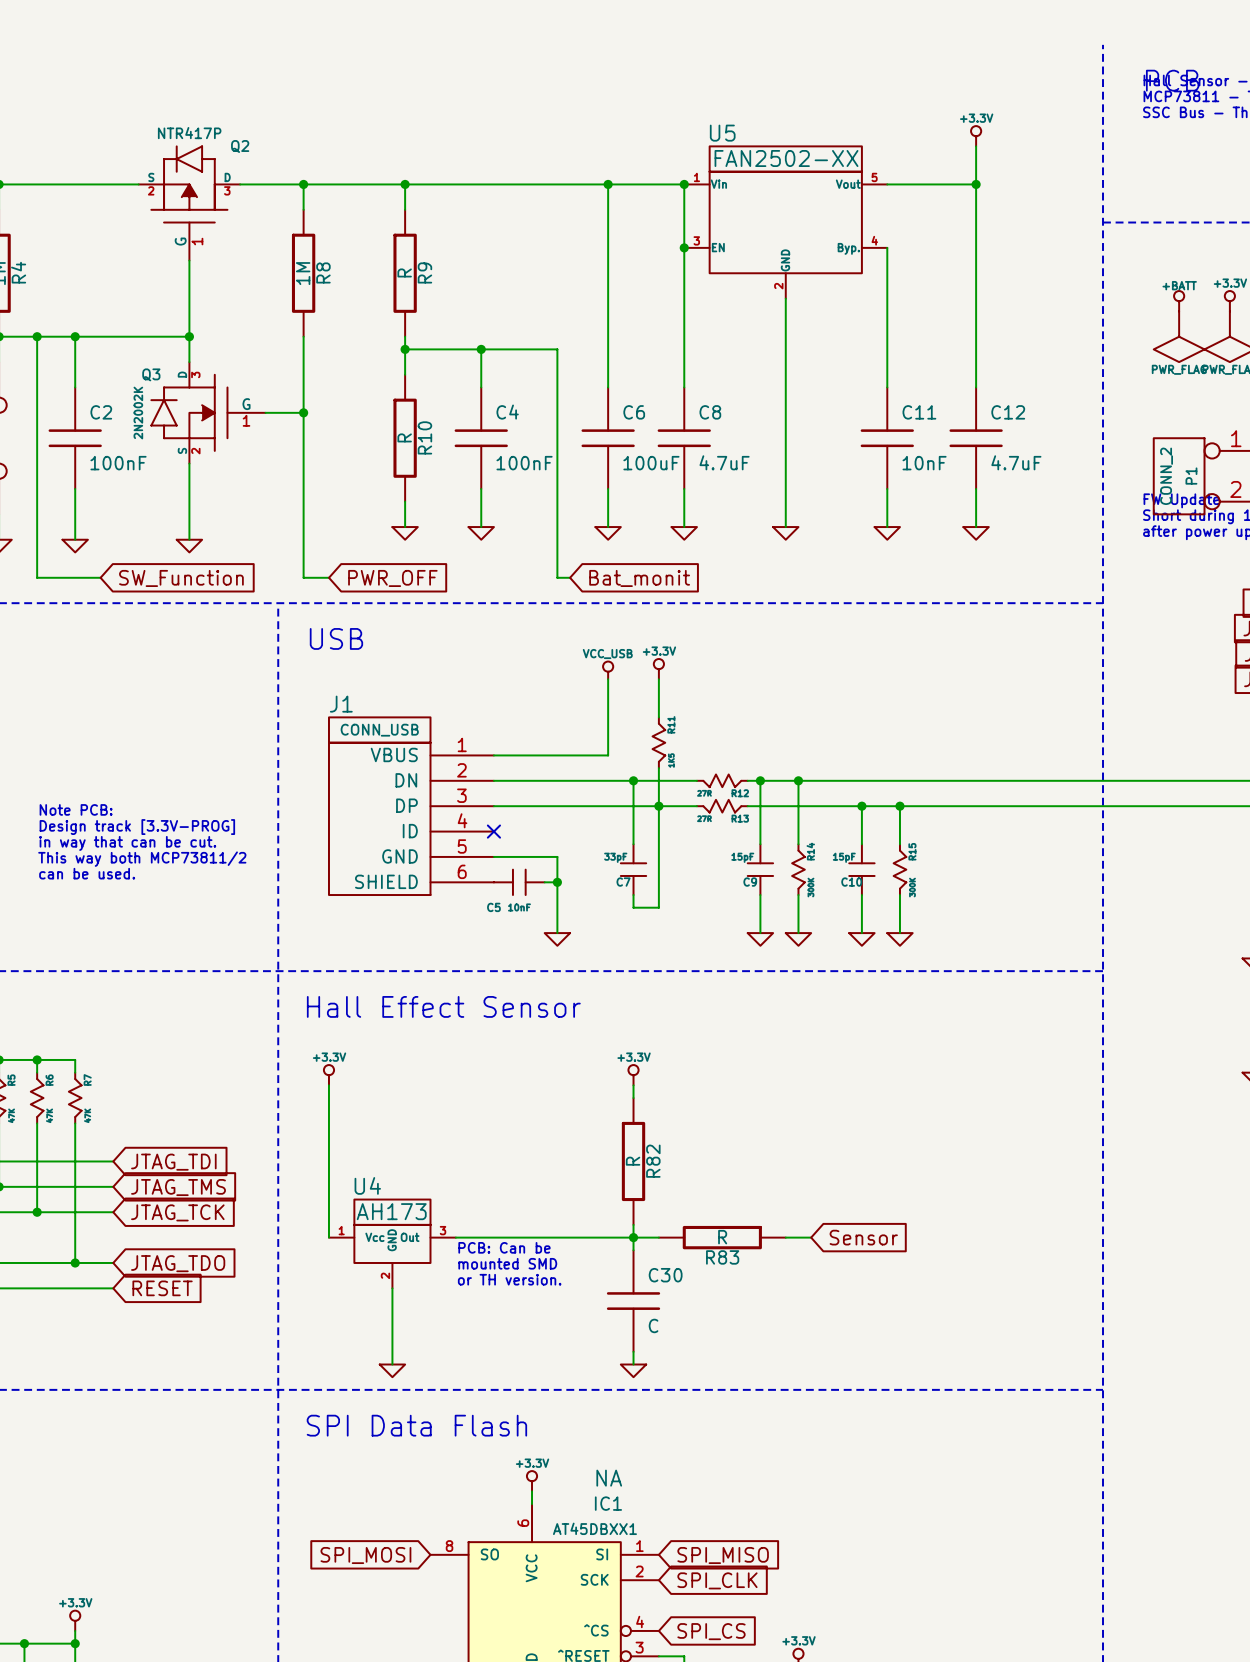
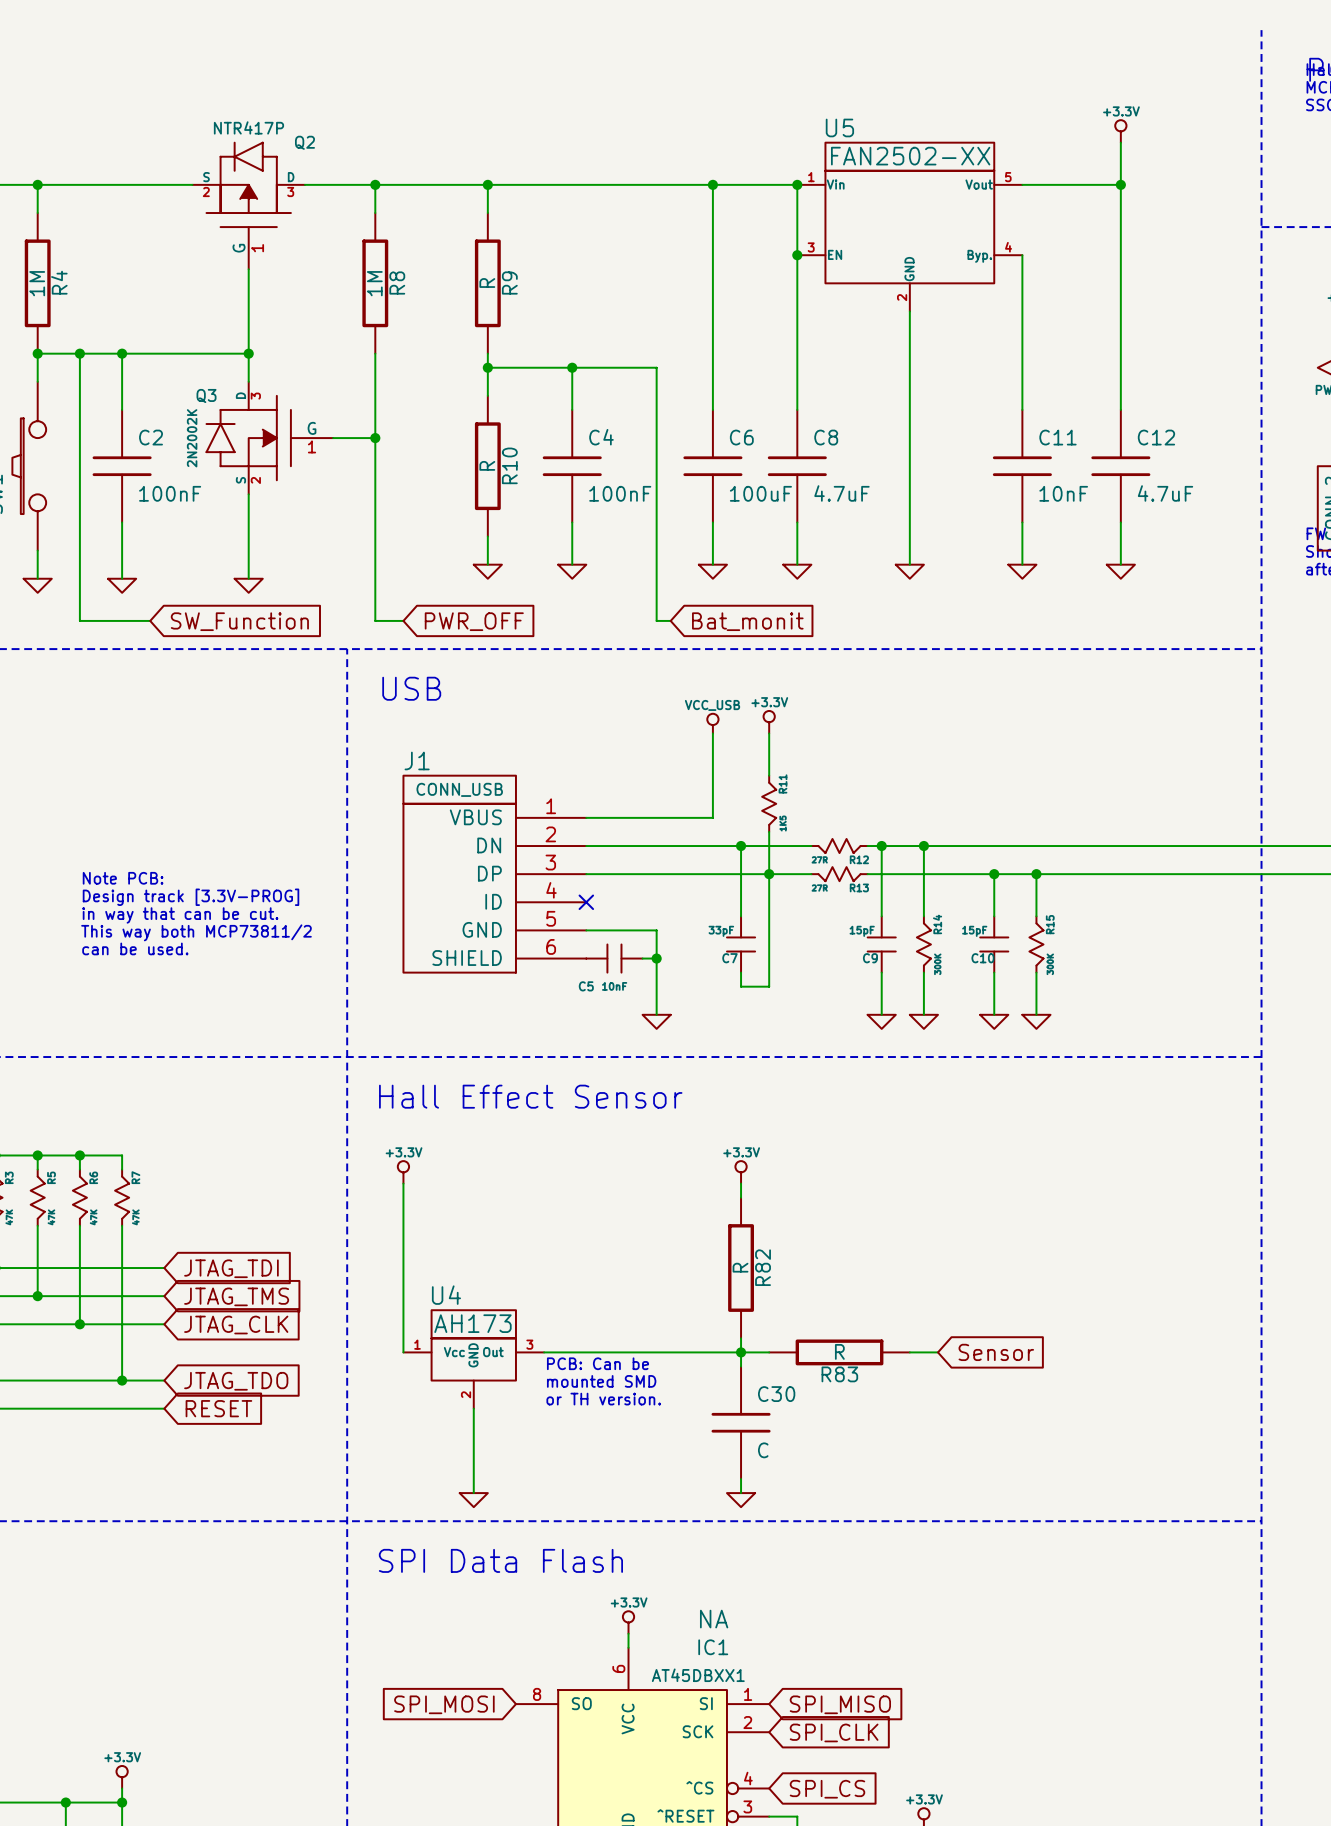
global label: JTAG_TCK (177, 1212) -> JTAG_CLK (236, 1325)

